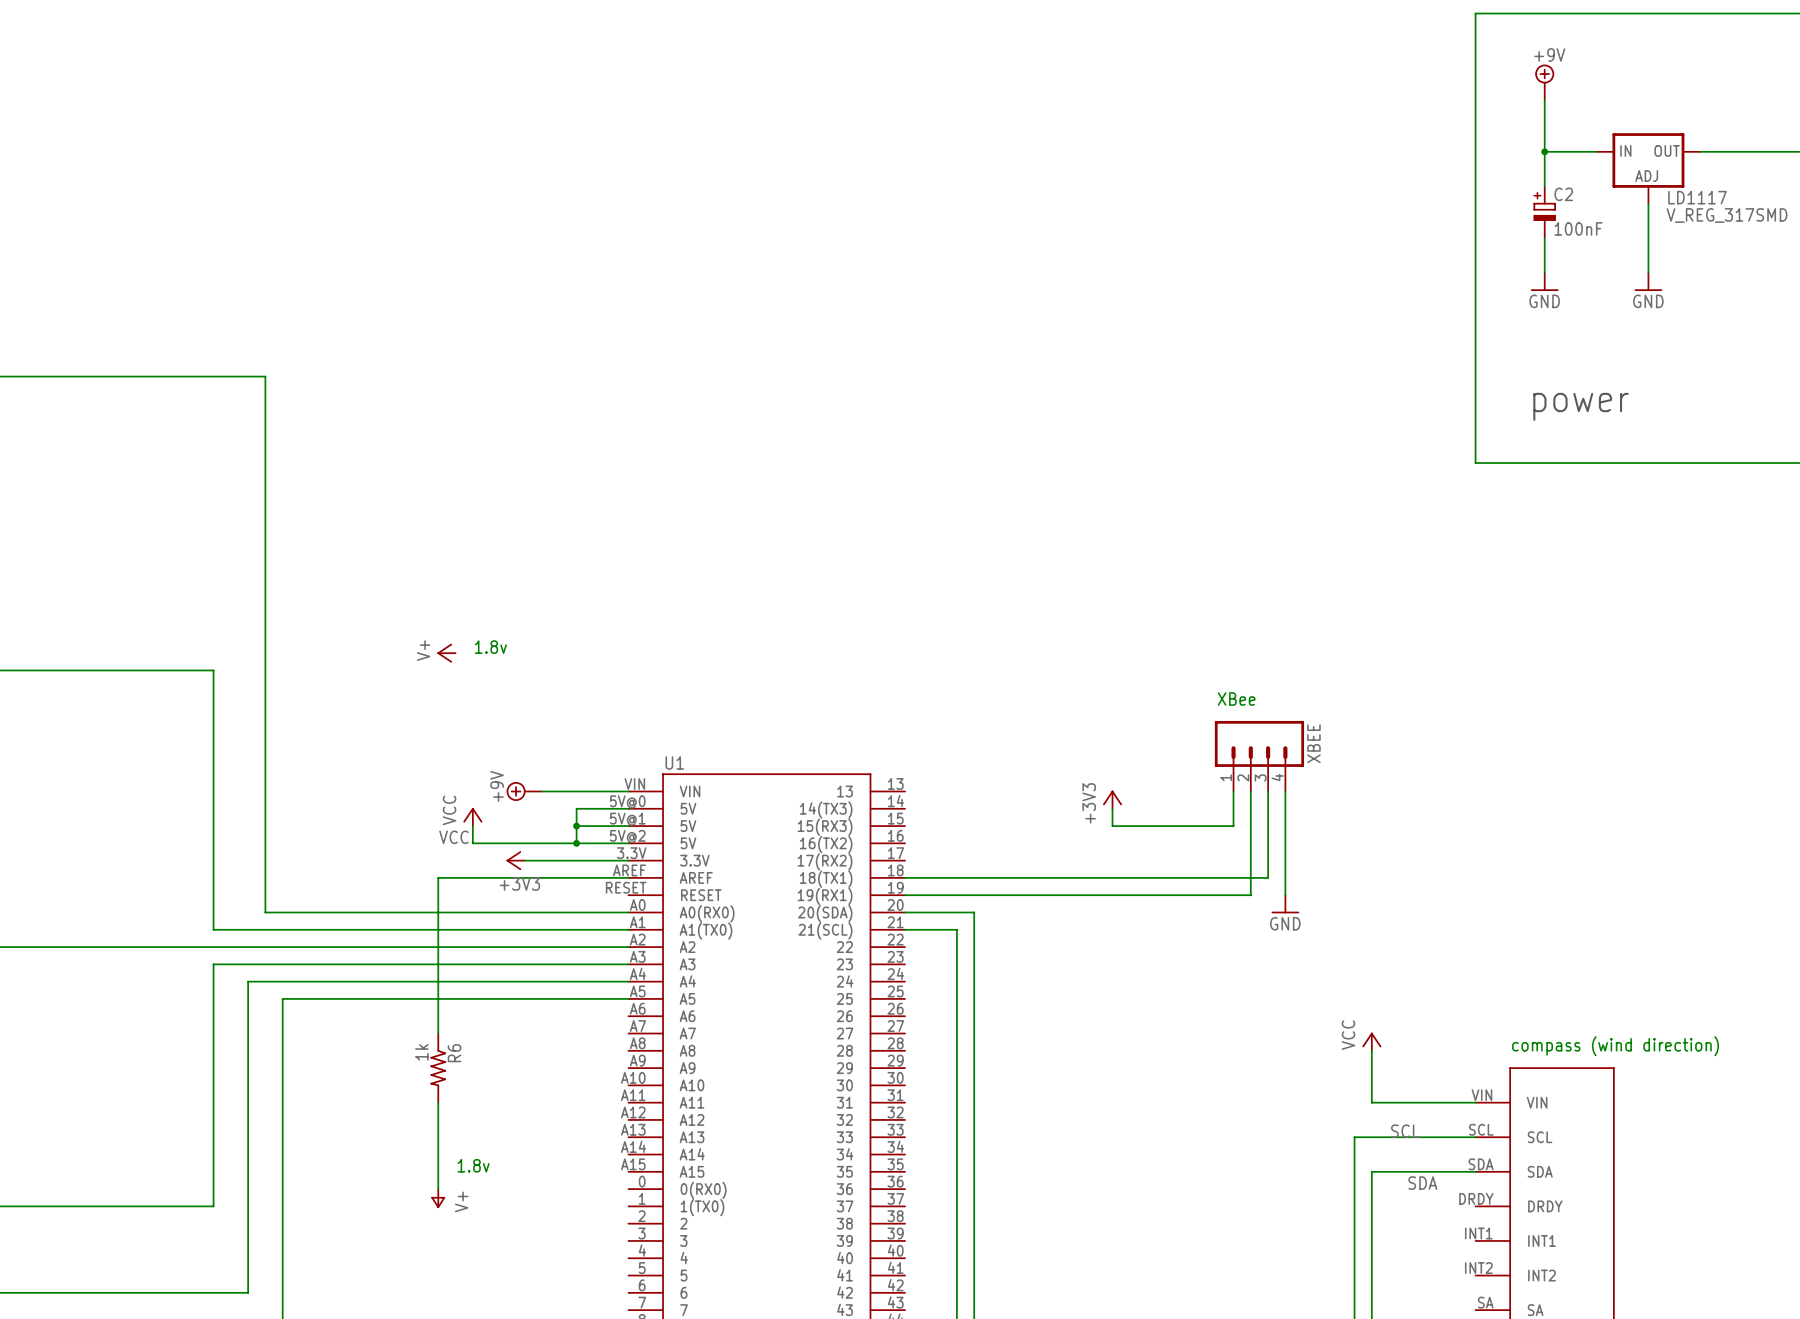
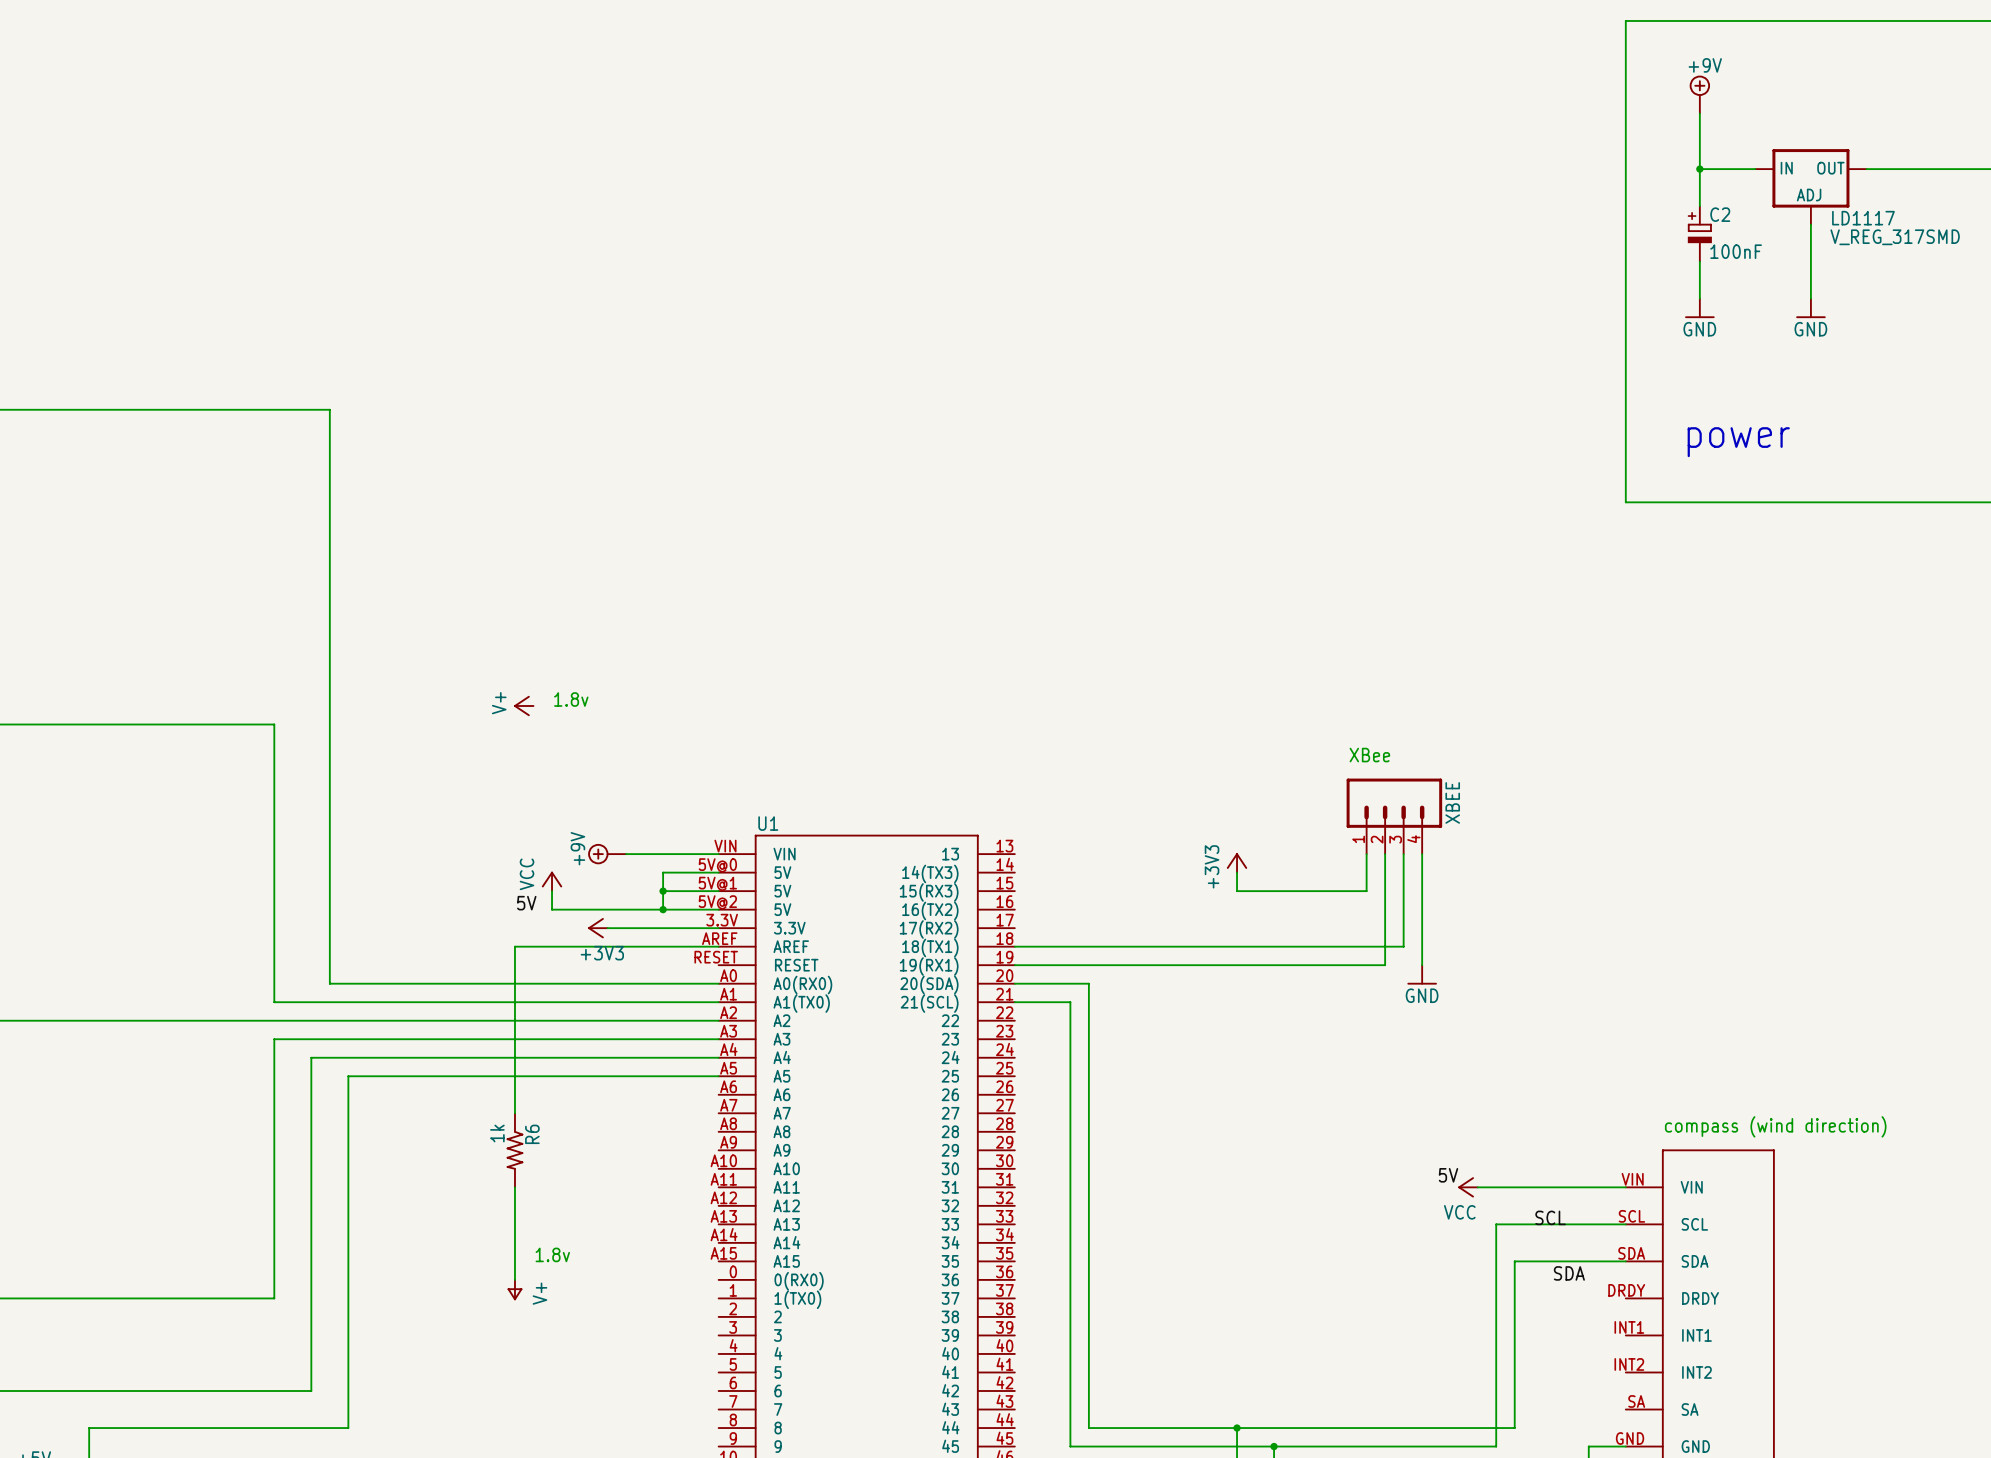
label: VCC (453, 837) -> 5V (526, 903)
power symbol rotation: 0° (1371, 1040) -> 90° counterclockwise (1466, 1187)
power symbol position: VCC (1371, 1041) -> VCC (1467, 1187)
wire: (1371, 1050) (1371, 1102) -> (1477, 1187) (1514, 1187)
label: none -> 5V (1448, 1175)

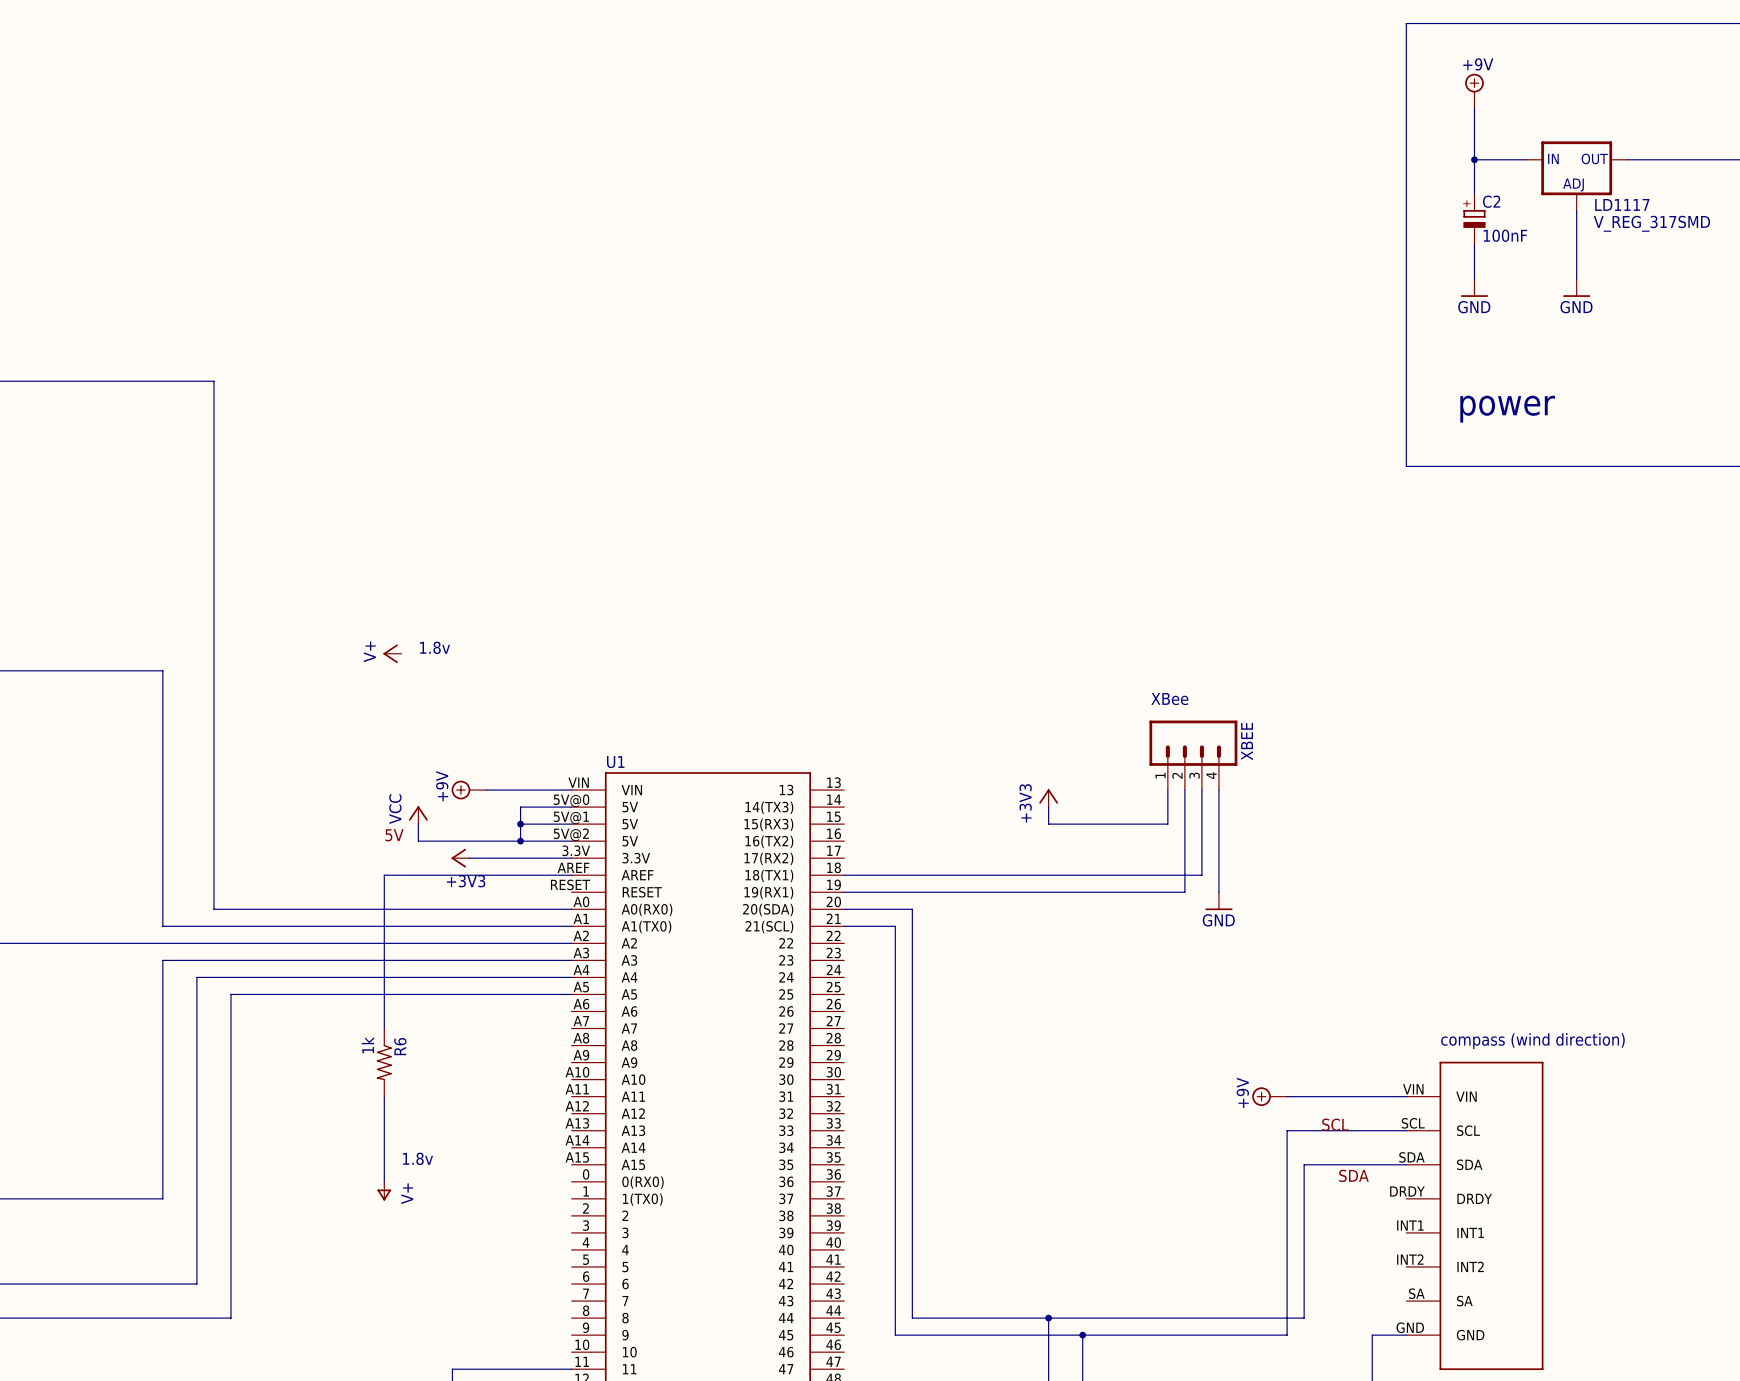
label: 5V (1448, 1175) -> none
power symbol: VCC (1467, 1187) -> none
power symbol: none -> +9V (1269, 1096)

